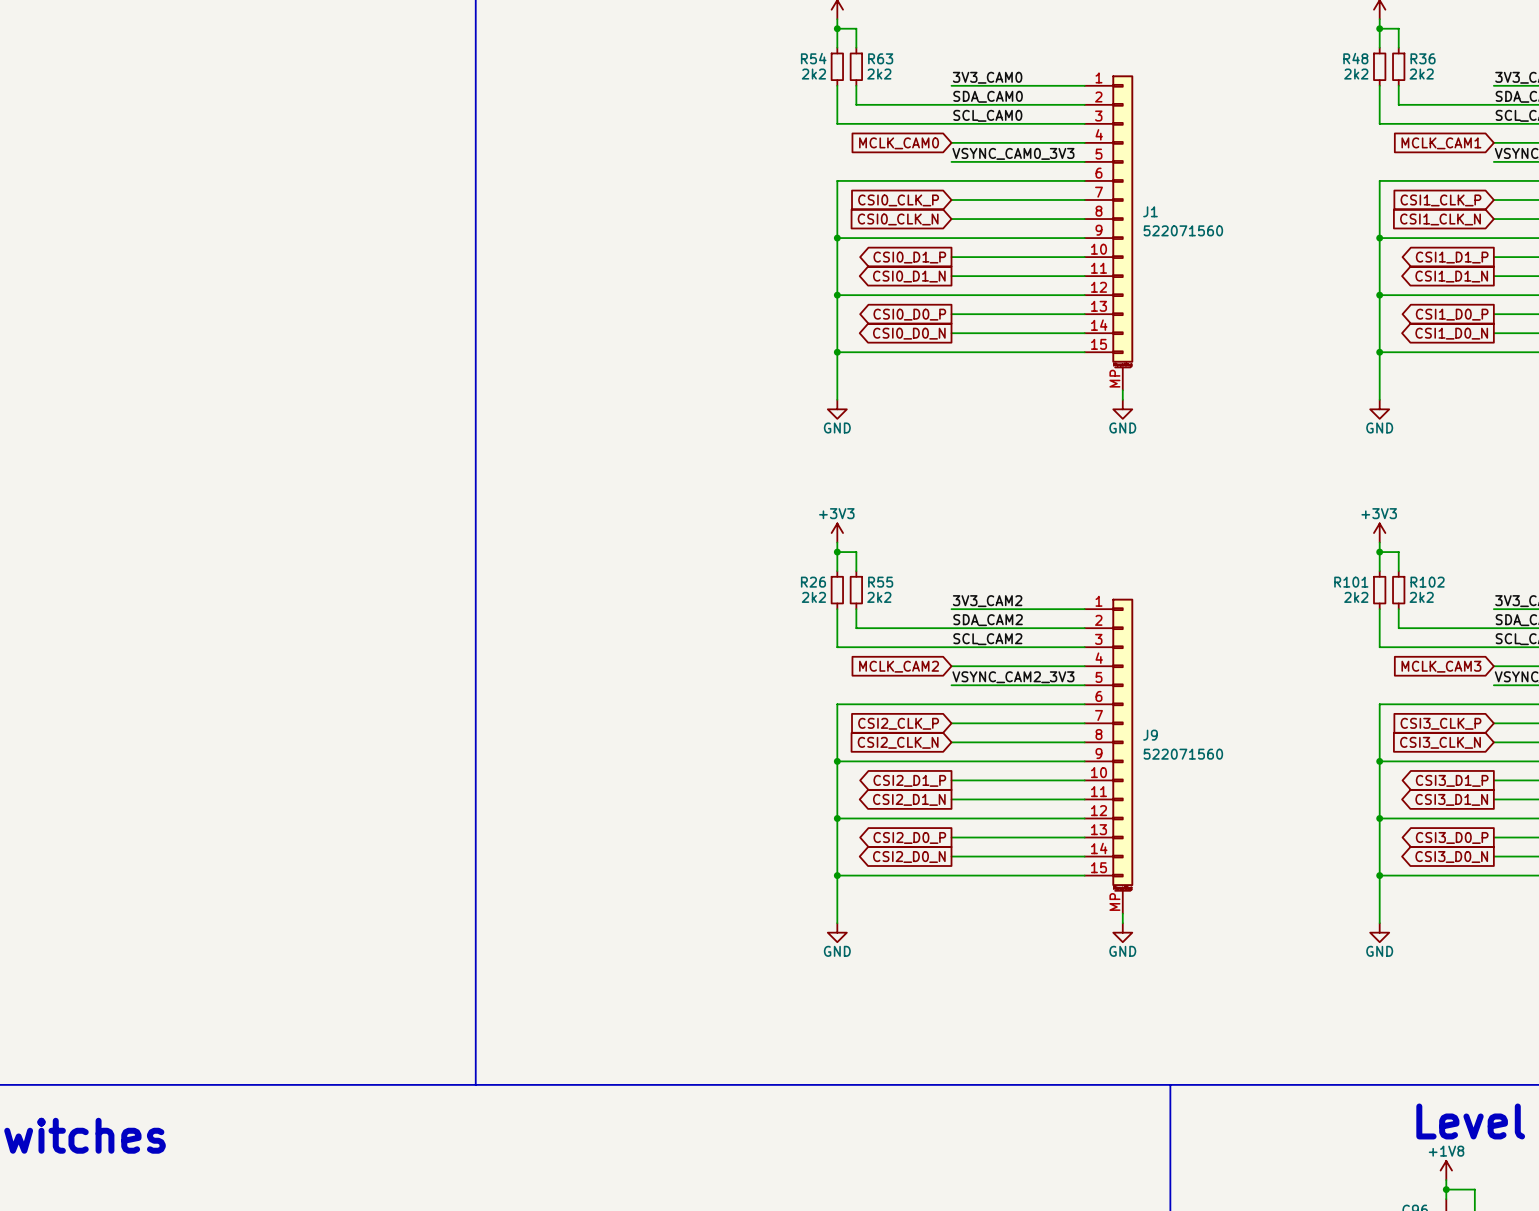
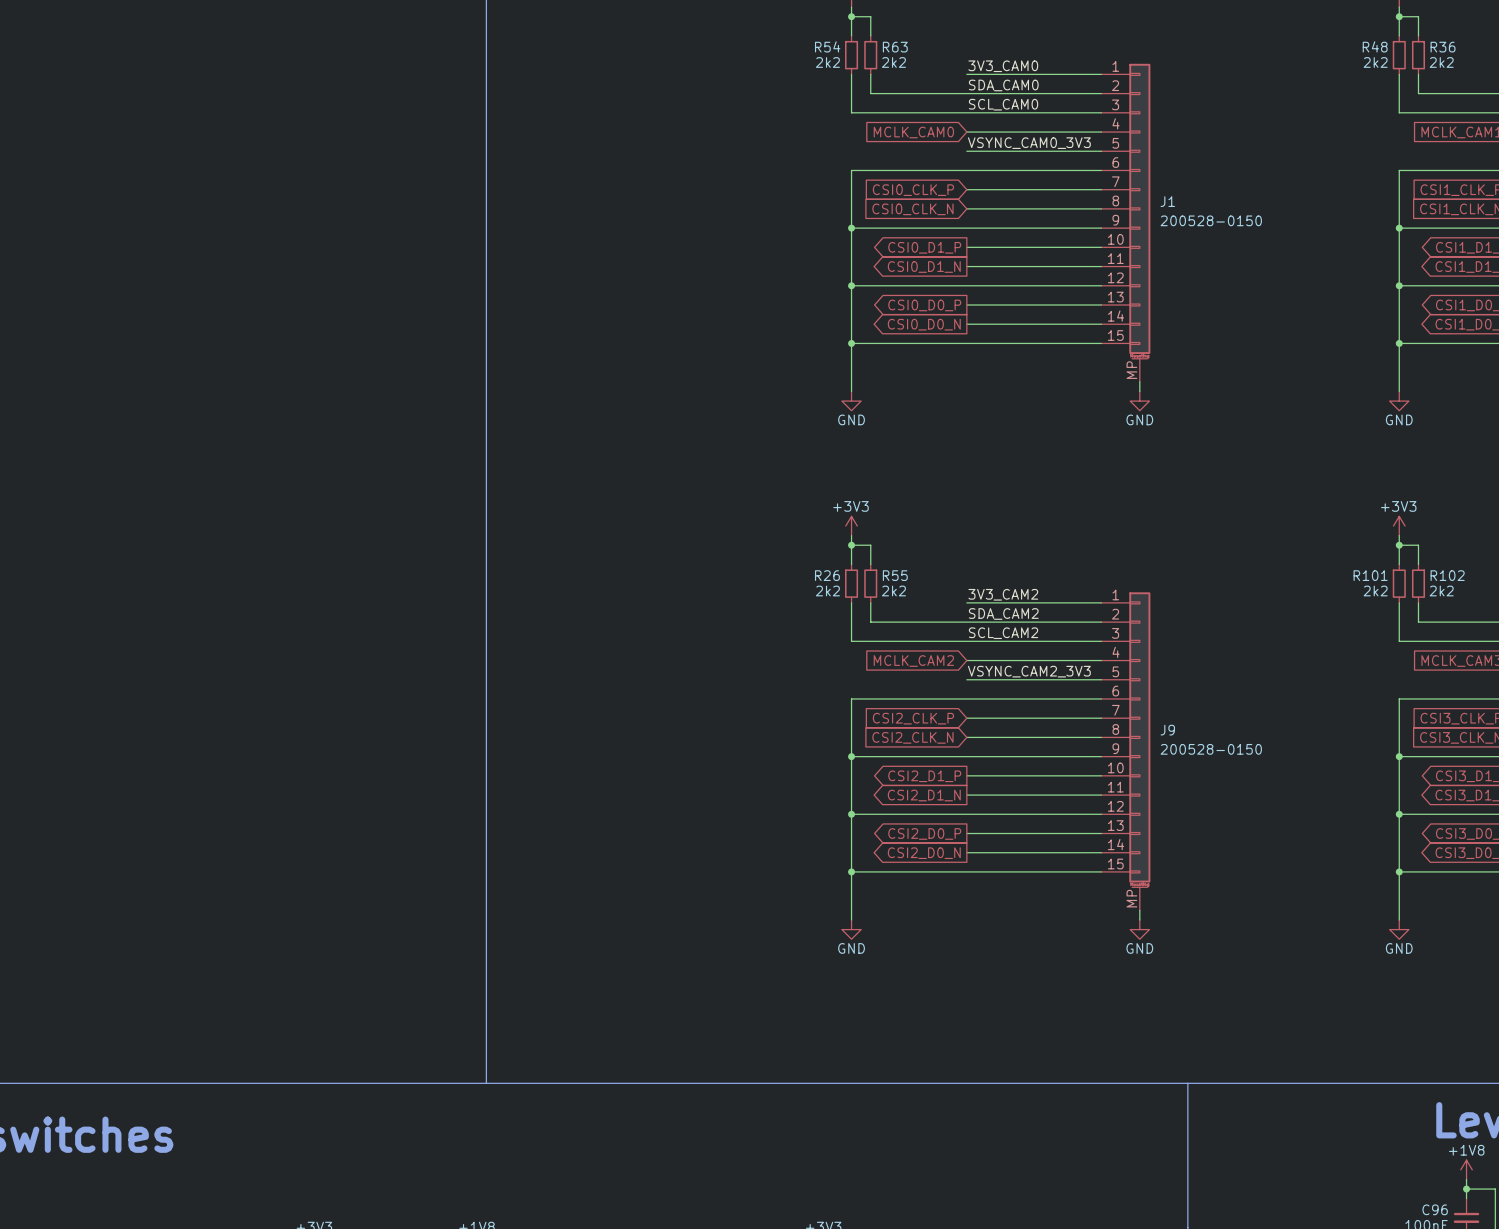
J1 value: 522071560 (1183, 230) -> 200528-0150 (1211, 220)
J9 value: 522071560 (1183, 754) -> 200528-0150 (1211, 749)

